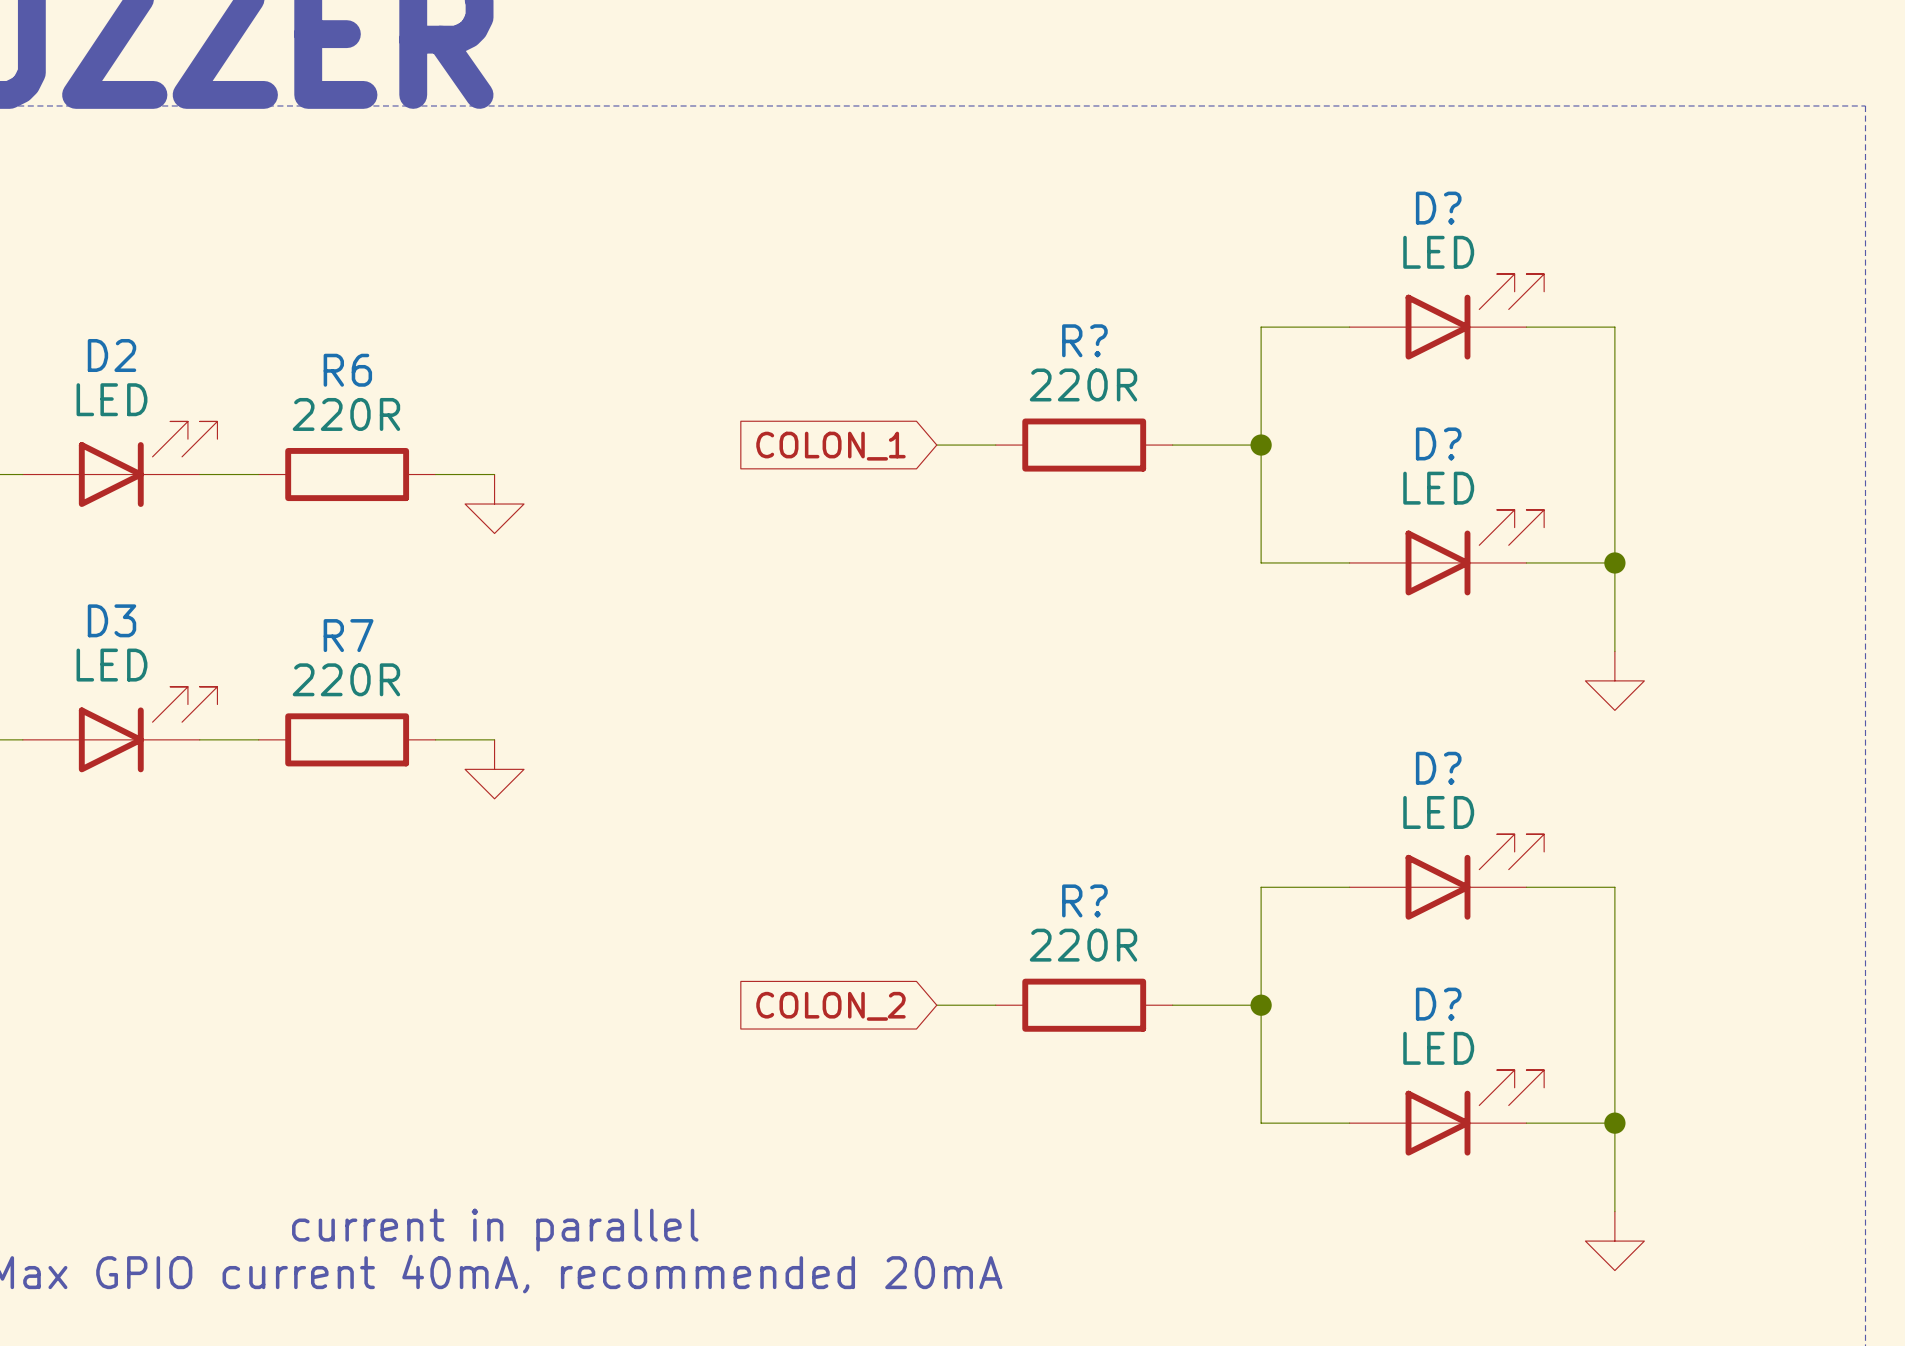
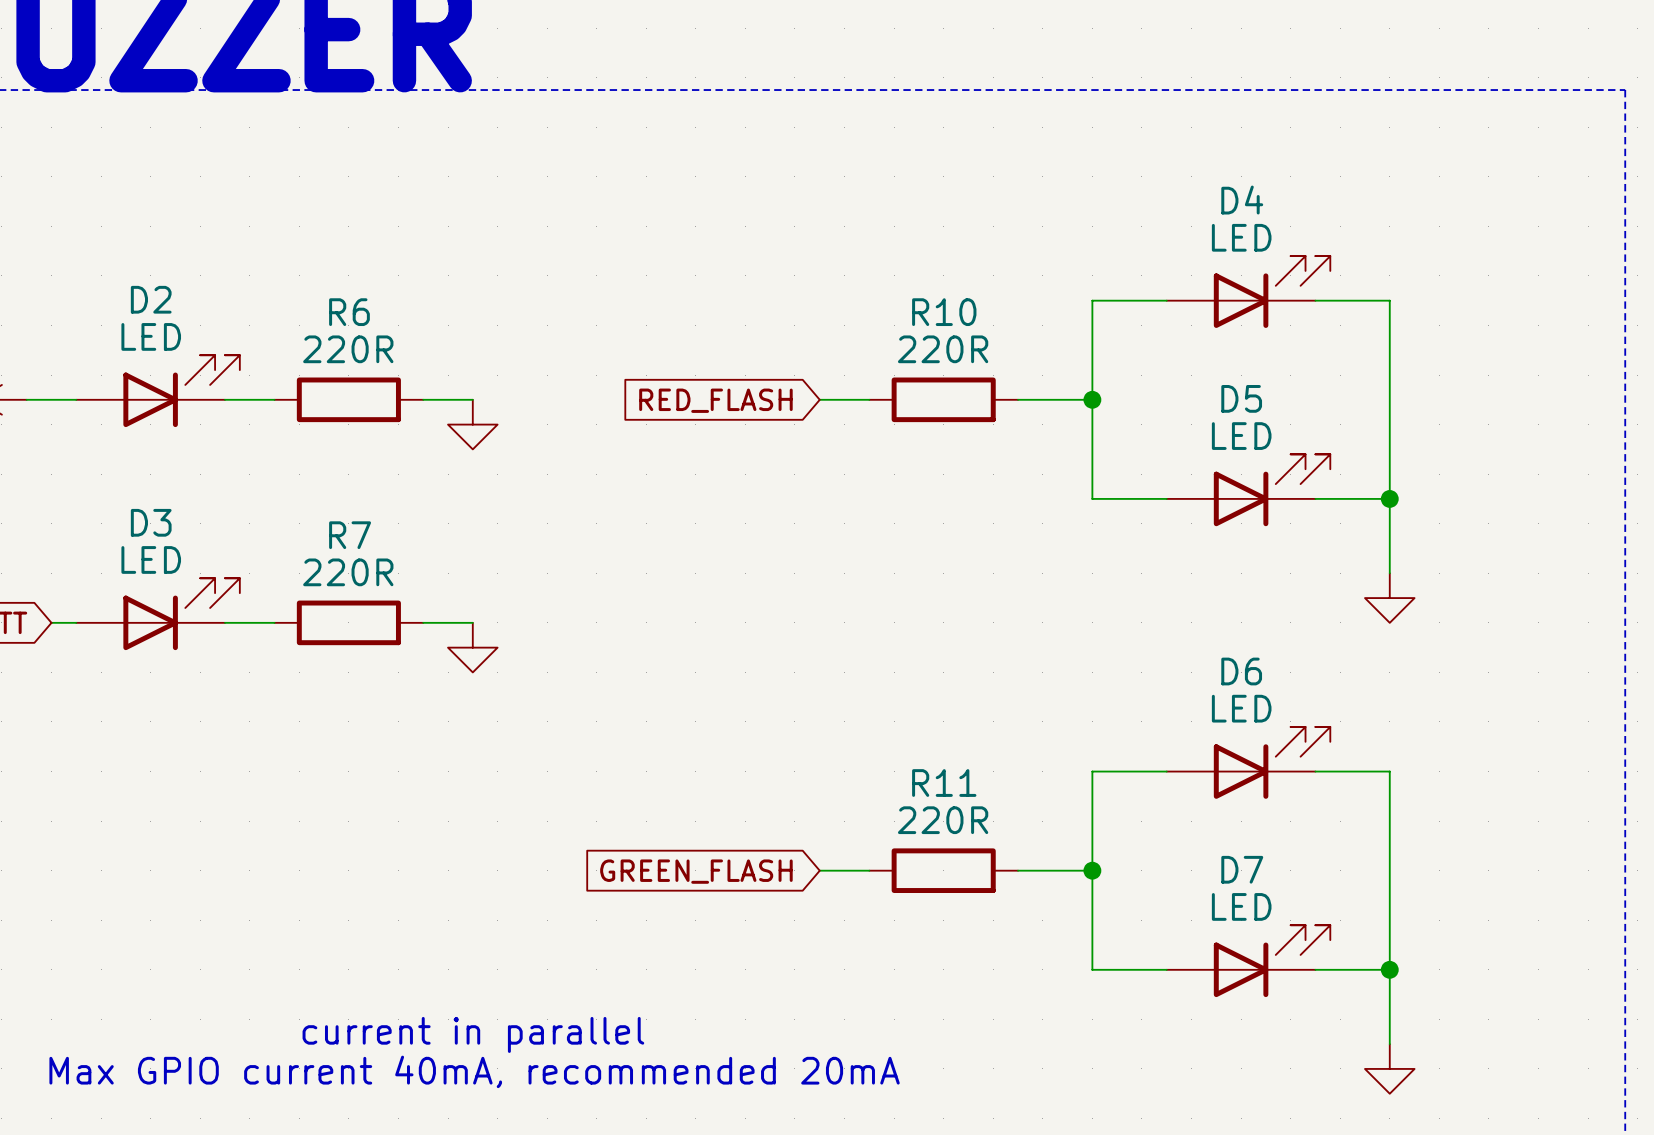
D?: LED (1446, 316) -> none
wire: (1349, 327) (1261, 327) (1261, 562) (1349, 562) -> (1166, 300) (1092, 300) (1092, 498) (1166, 498)
wire: (1526, 327) (1614, 327) (1614, 651) -> (1315, 300) (1389, 300) (1389, 573)
D4: none -> LED (1248, 292)
wire: (936, 445) (995, 445) -> (819, 399) (869, 399)
R?: 220R (1084, 445) -> none
wire: (1172, 445) (1261, 445) -> (1018, 399) (1092, 399)
junction position: (1261, 445) -> (1092, 399)
global label: COLON_1 (830, 446) -> none
R10: none -> 220R (943, 399)
global label: none -> RED_FLASH (715, 400)
D?: LED (1446, 552) -> none
wire: (1526, 562) (1614, 562) -> (1315, 498) (1389, 498)
junction position: (1614, 562) -> (1389, 498)
D5: none -> LED (1248, 490)
power symbol position: (1614, 680) -> (1389, 598)
D?: LED (1446, 876) -> none
wire: (1349, 887) (1261, 887) (1261, 1123) (1349, 1123) -> (1166, 771) (1092, 771) (1092, 969) (1166, 969)
wire: (1526, 887) (1614, 887) (1614, 1211) -> (1315, 771) (1389, 771) (1389, 1044)
D6: none -> LED (1248, 762)
wire: (936, 1005) (995, 1005) -> (819, 870) (869, 870)
R?: 220R (1084, 1005) -> none
wire: (1172, 1005) (1261, 1005) -> (1018, 870) (1092, 870)
junction position: (1261, 1005) -> (1092, 870)
global label: COLON_2 (830, 1006) -> none
R11: none -> 220R (943, 870)
global label: none -> GREEN_FLASH (696, 871)
D?: LED (1446, 1112) -> none
wire: (1526, 1123) (1614, 1123) -> (1315, 969) (1389, 969)
junction position: (1614, 1123) -> (1389, 969)
D7: none -> LED (1248, 961)
power symbol position: (1614, 1241) -> (1389, 1068)

